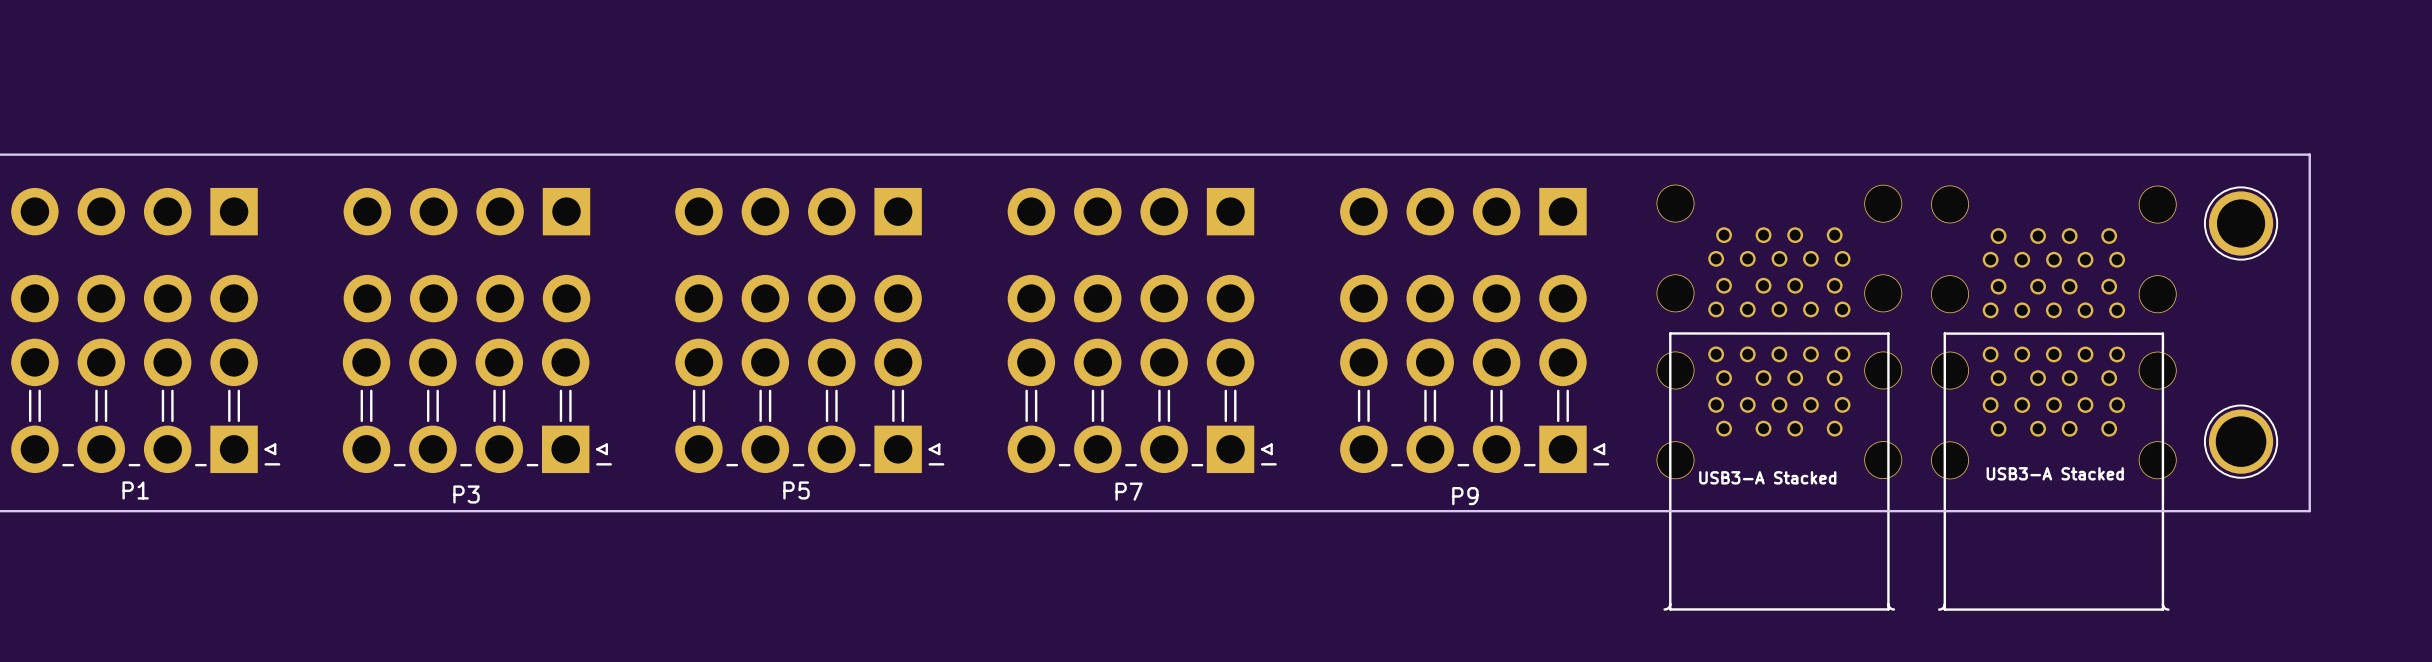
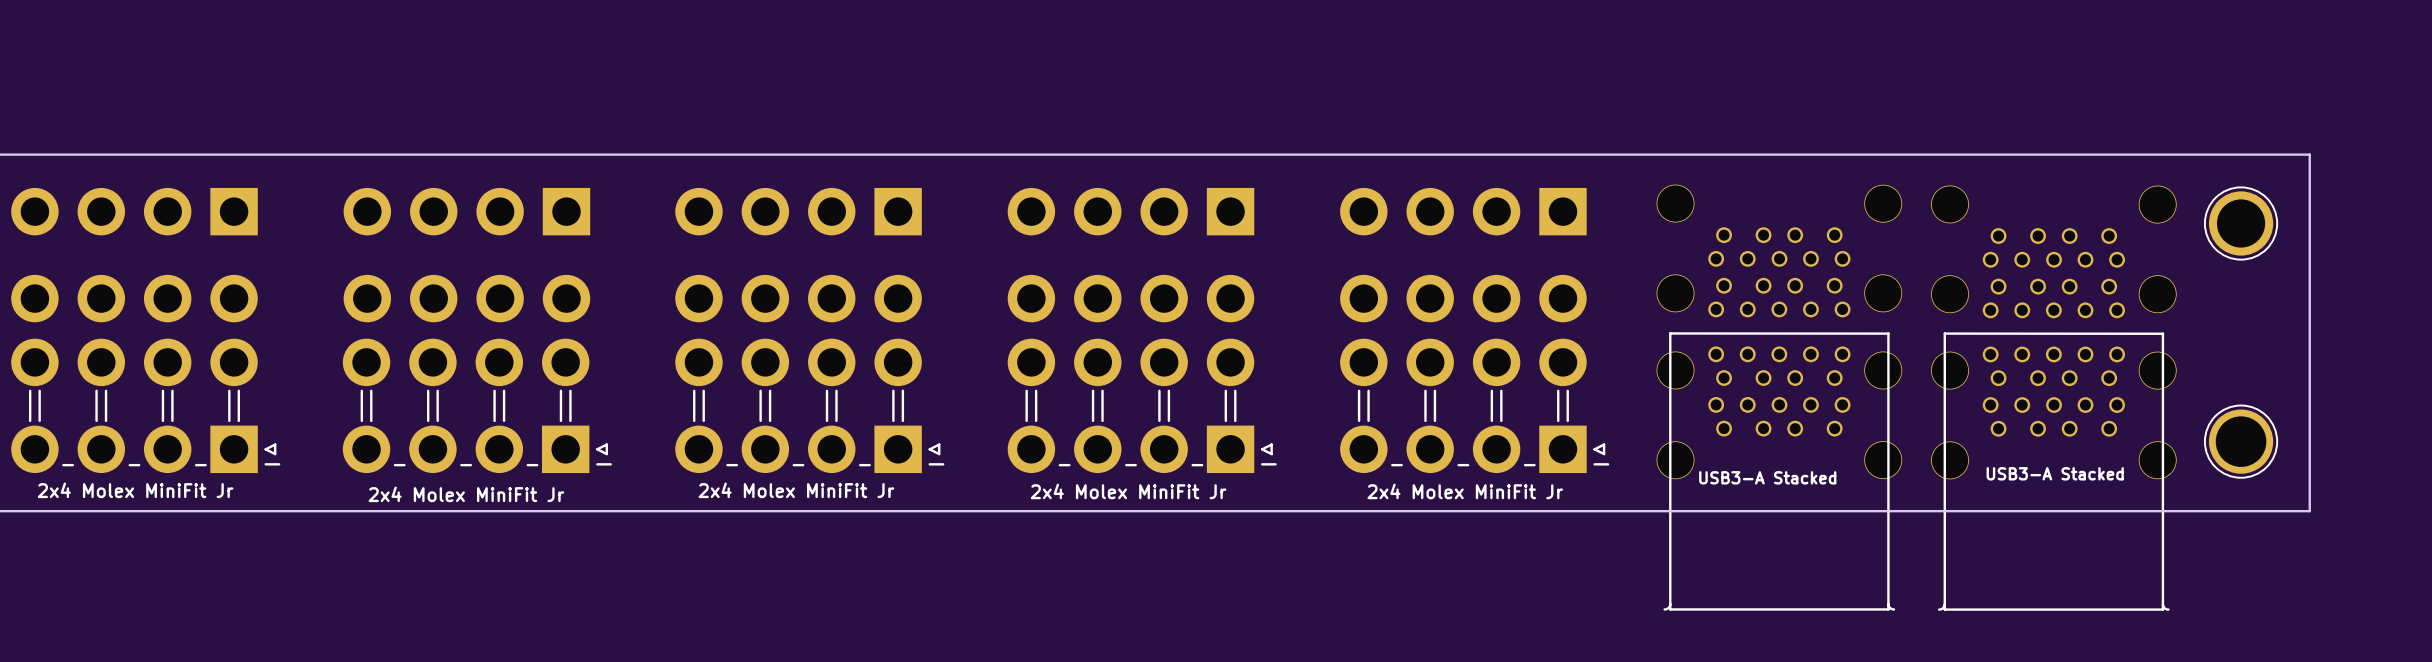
P1 name: P1 (135, 490) -> 2x4 Molex MiniFit Jr (135, 490)
P5 name: P5 (796, 490) -> 2x4 Molex MiniFit Jr (796, 490)
P7 name: P7 (1129, 491) -> 2x4 Molex MiniFit Jr (1128, 491)
P3 name: P3 (466, 494) -> 2x4 Molex MiniFit Jr (466, 494)
P9 name: P9 (1465, 496) -> 2x4 Molex MiniFit Jr (1465, 491)

